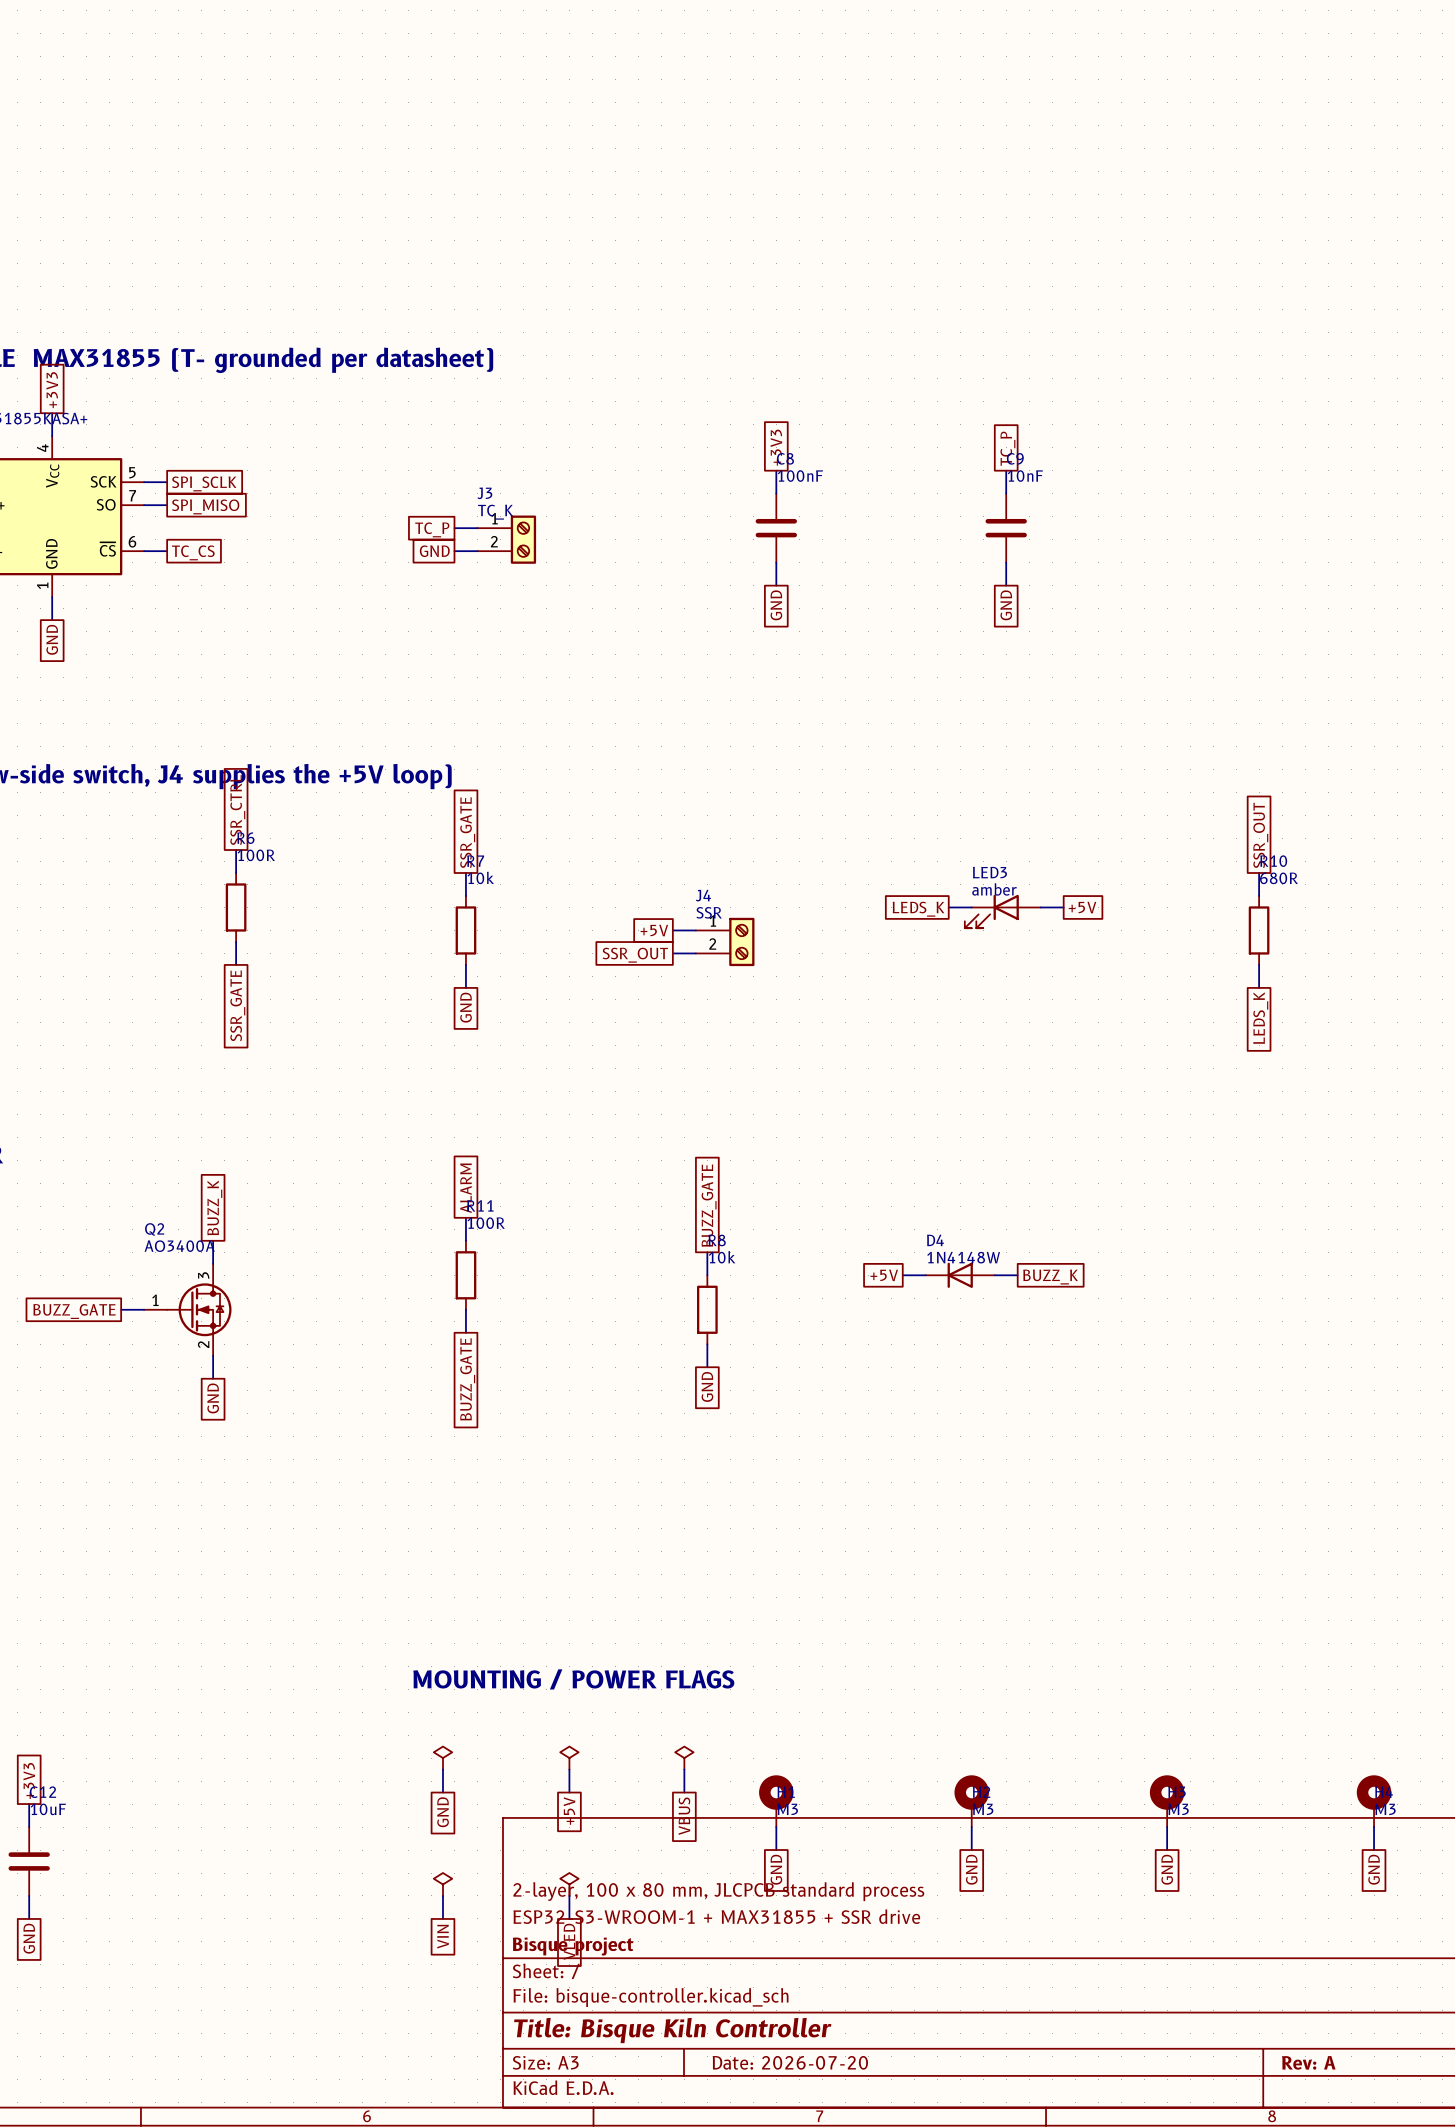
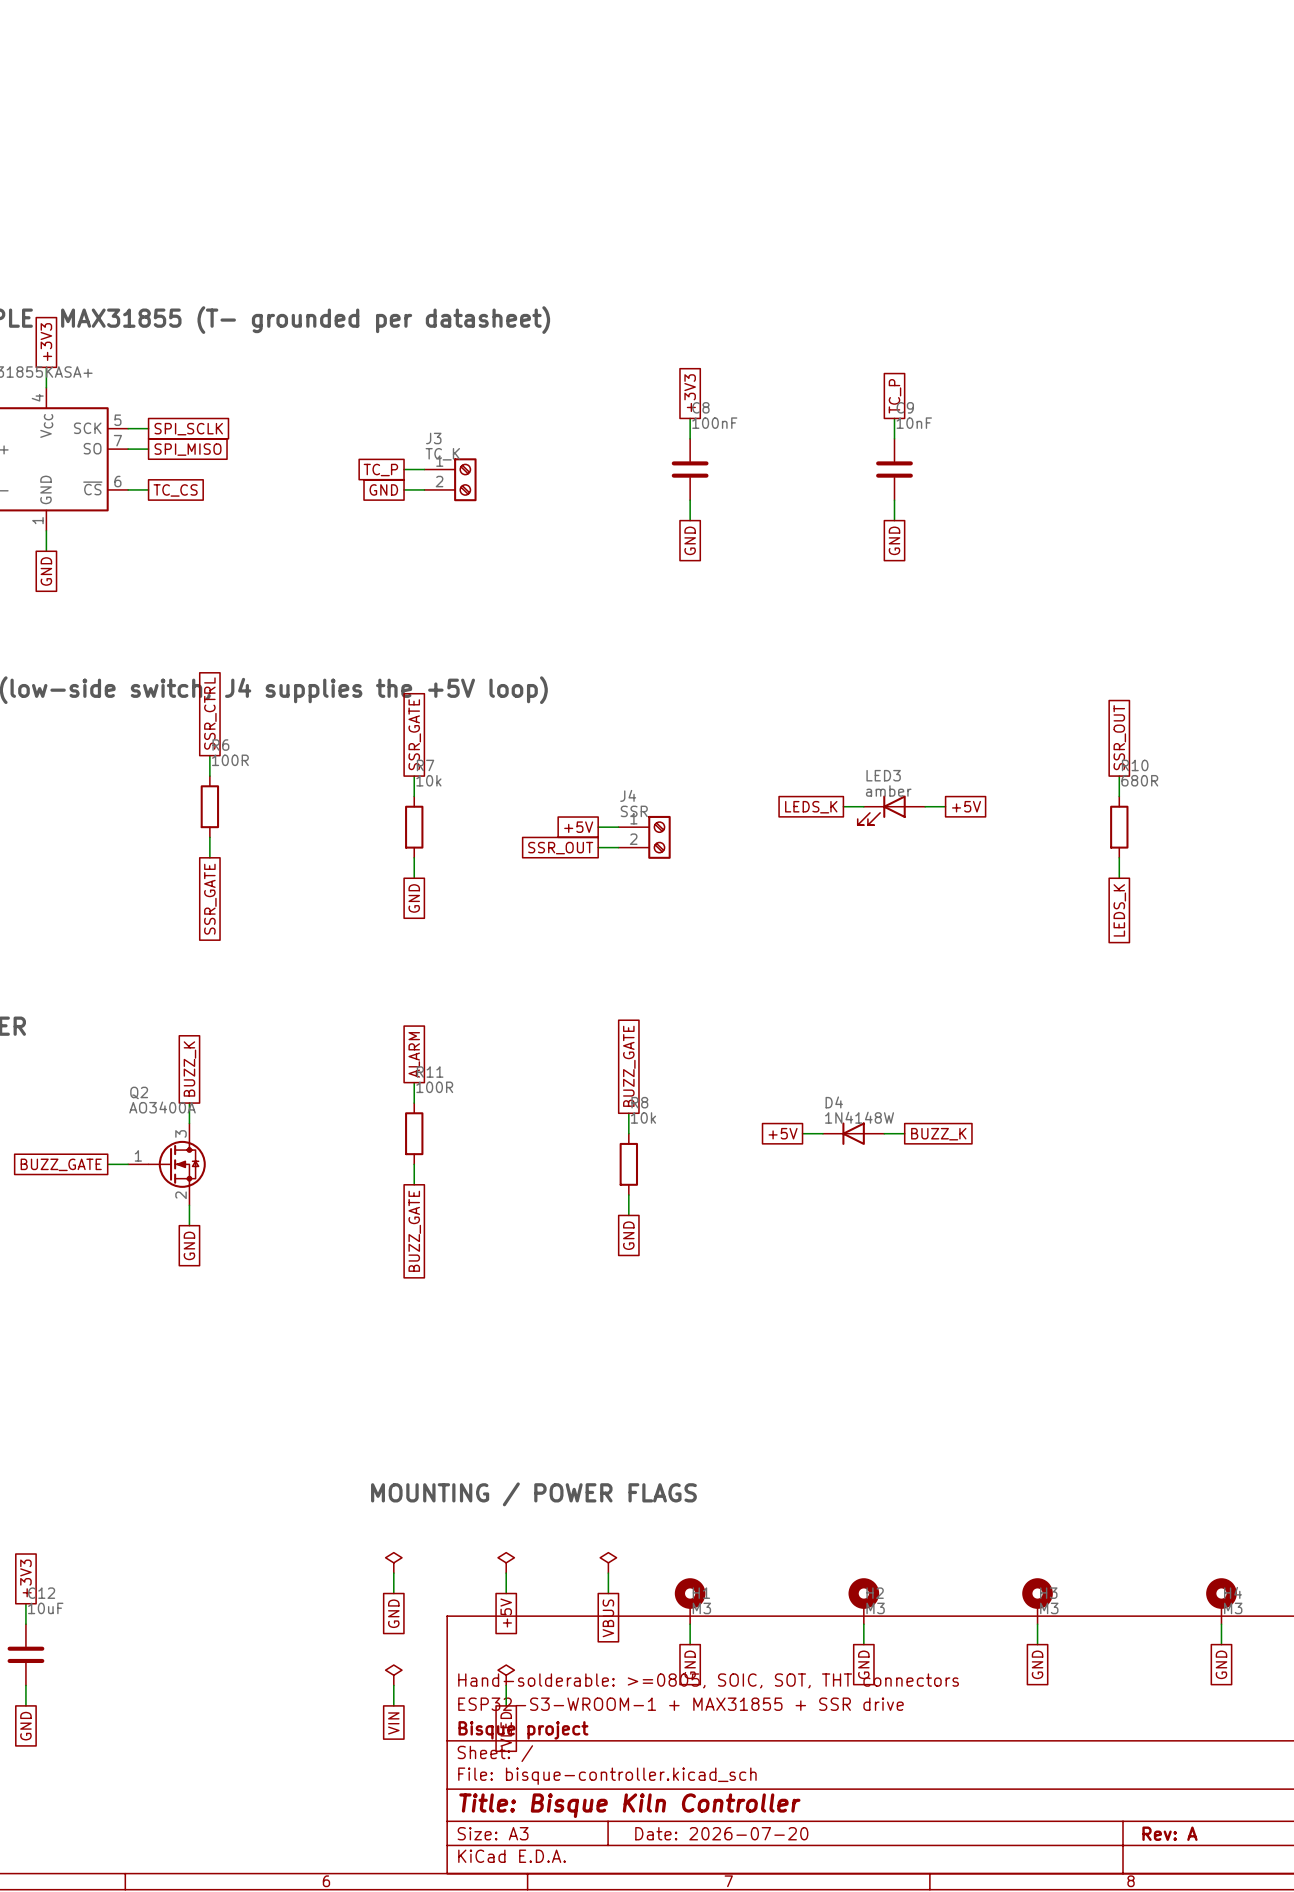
title block: 2-layer, 100 x 80 mm, JLCPCB standard process (718, 1891) -> Hand-solderable: >=0805, SOIC, SOT, THT connectors (708, 1680)

